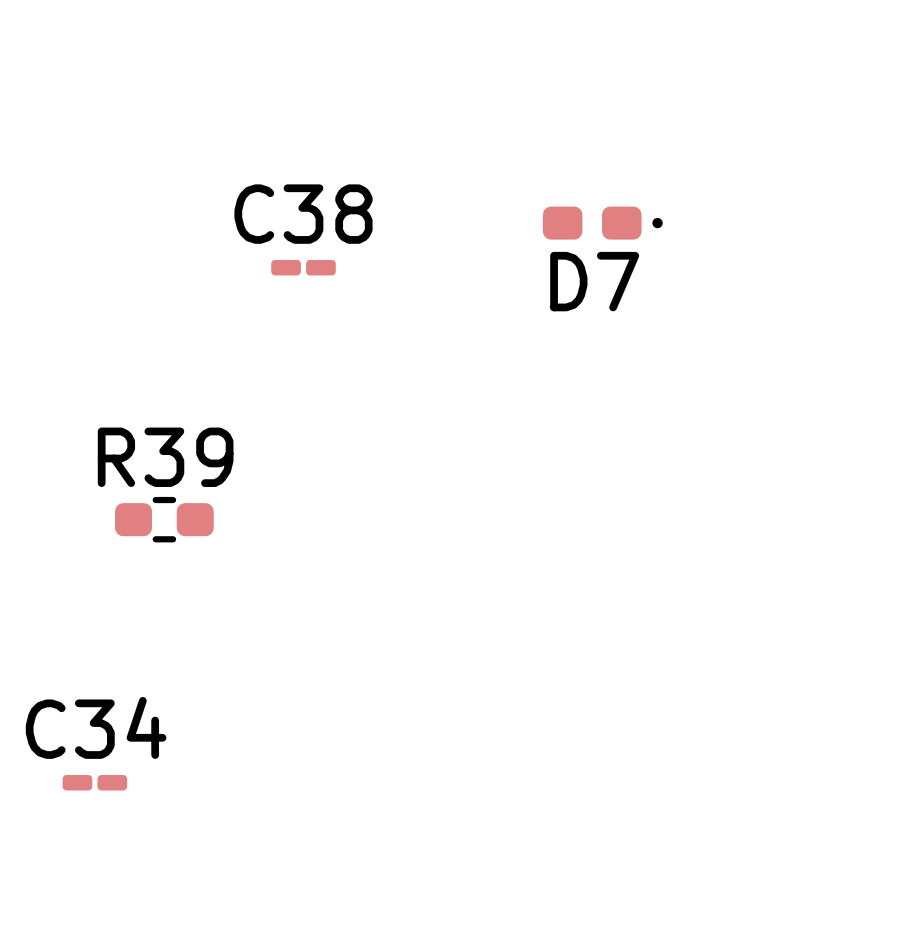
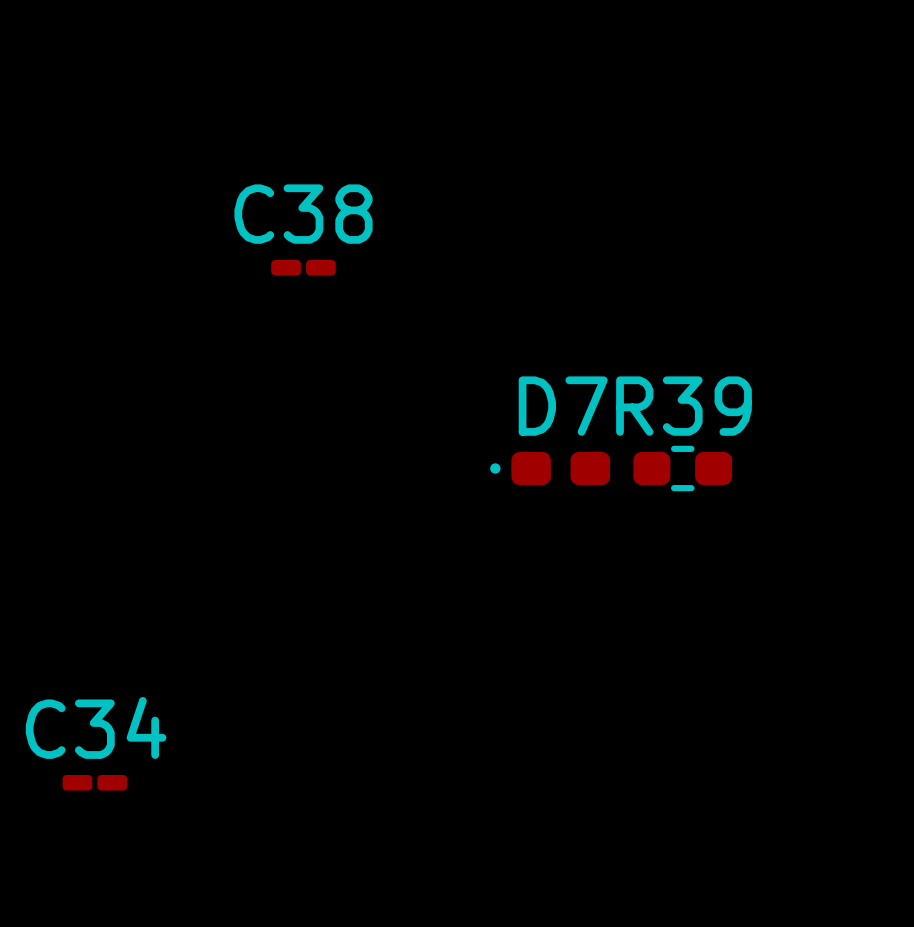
D7 rotation: 0° (602, 223) -> 180° (550, 468)
D7 position: (602, 223) -> (550, 468)
R39 position: (164, 519) -> (682, 468)

